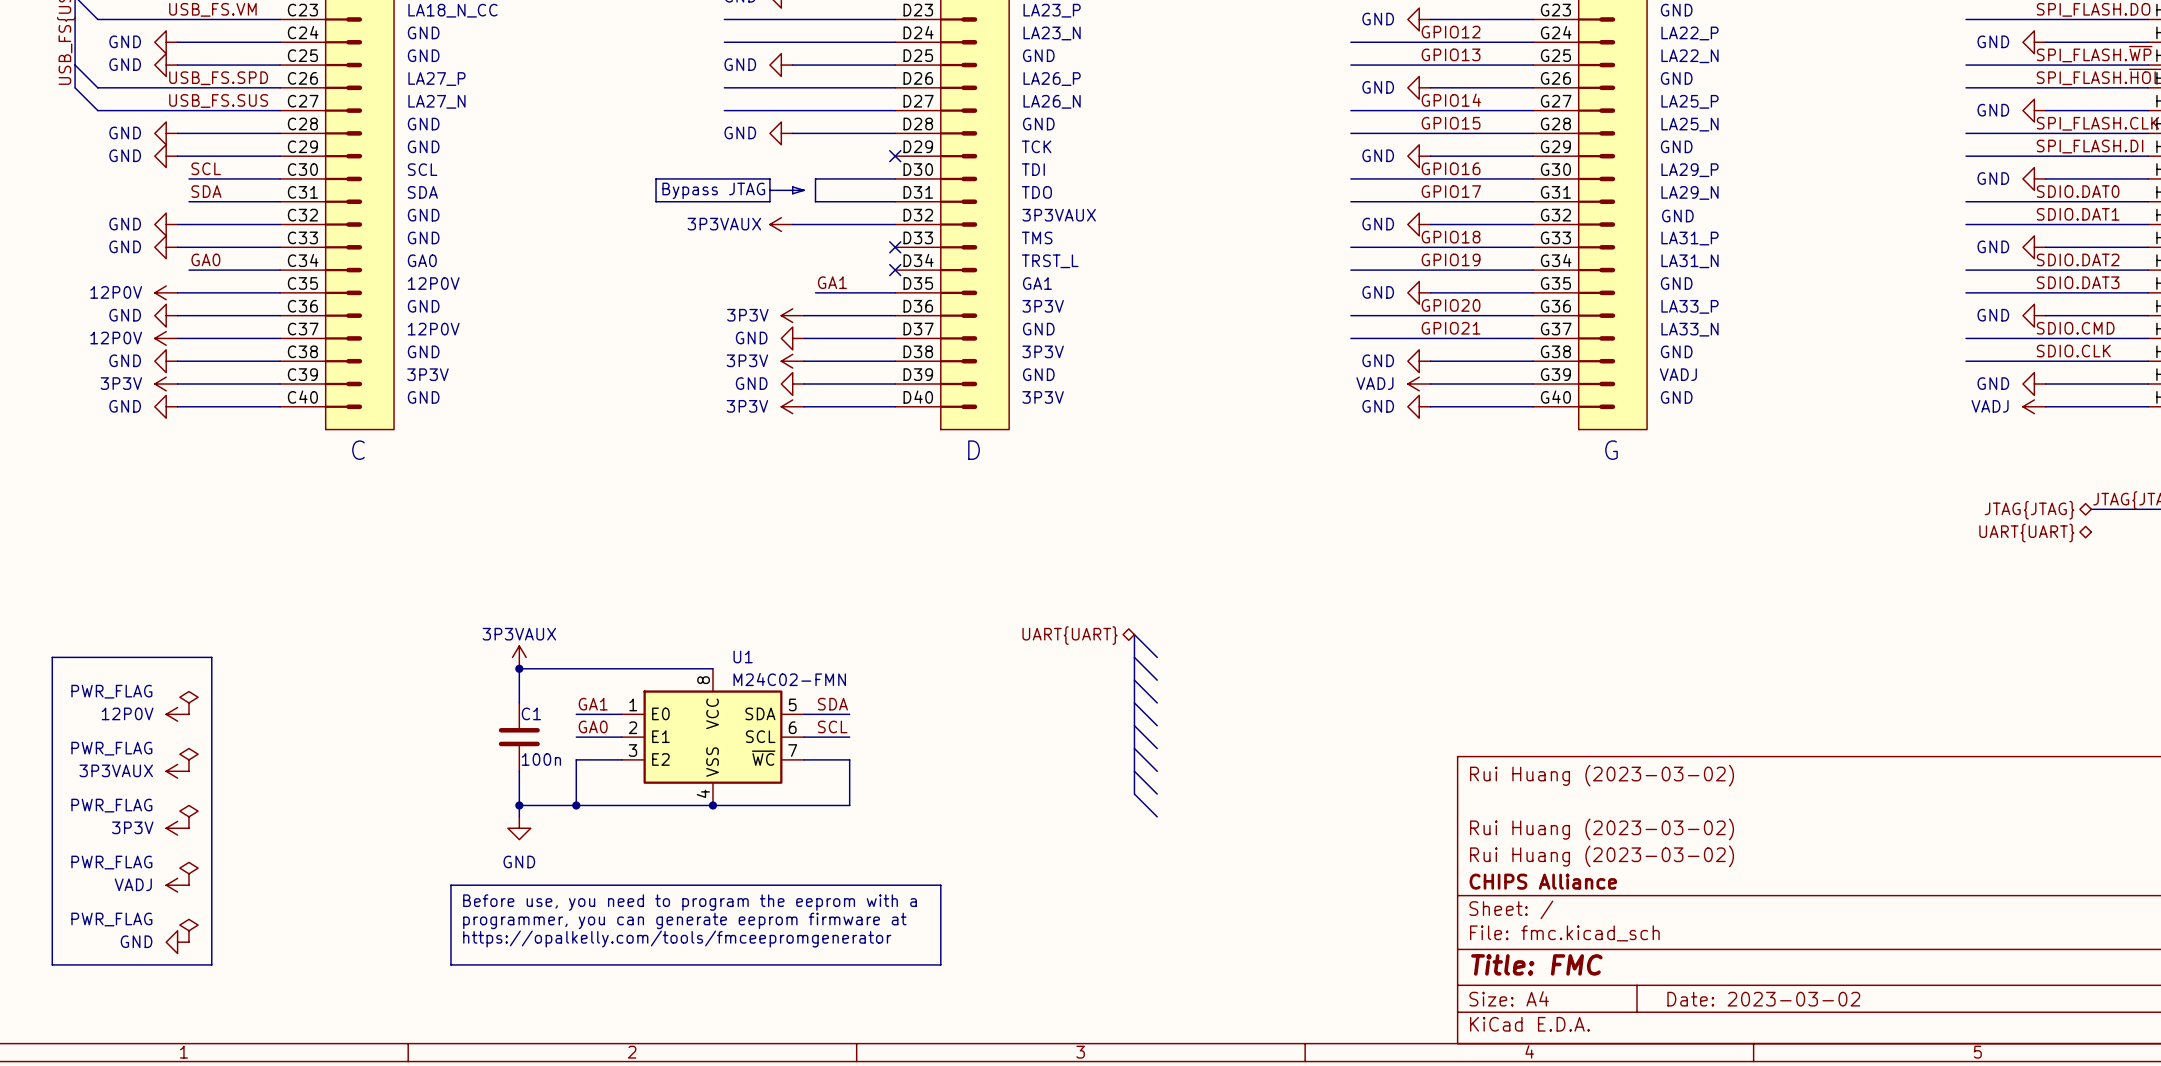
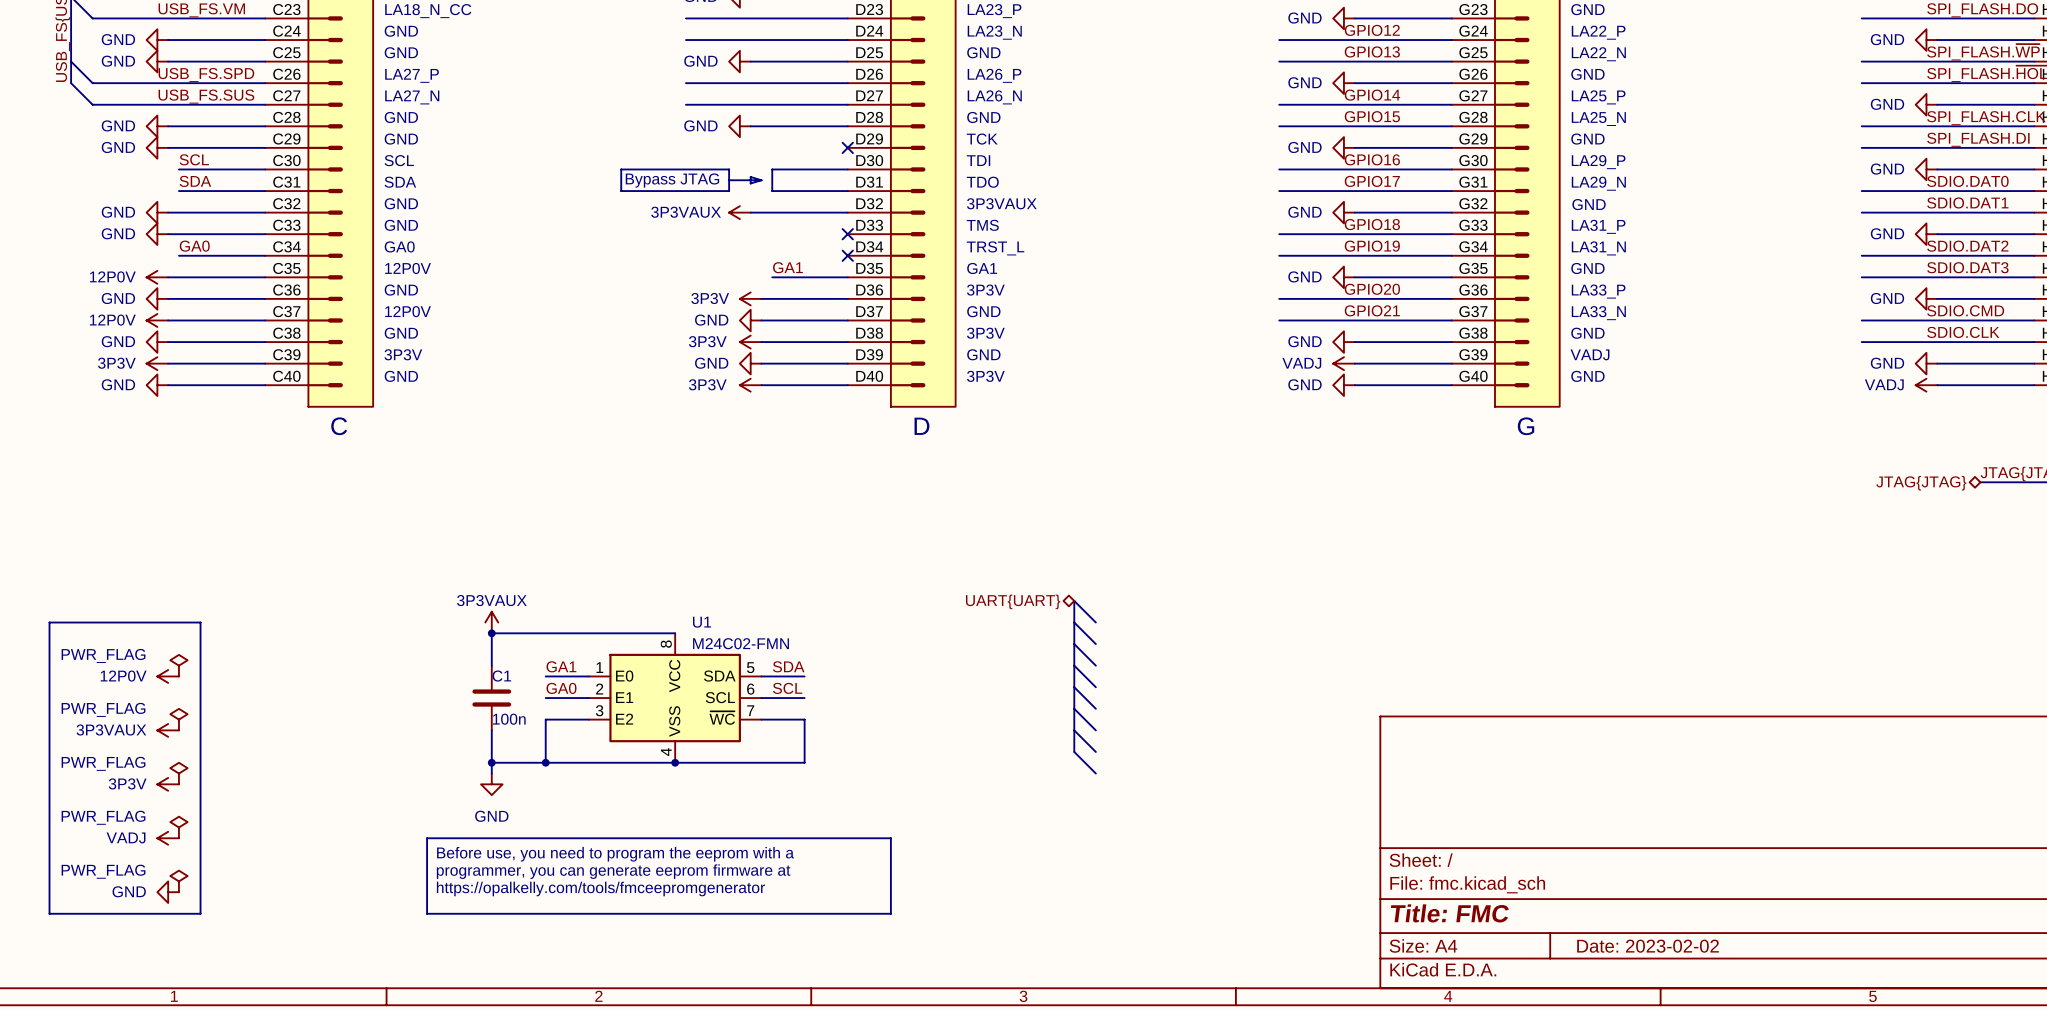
hierarchical label: UART{UART} (2026, 533) -> none
title block: Rui Huang (2023-03-02) (1602, 775) -> none
title block: Rui Huang (2023-03-02) (1602, 829) -> none
title block: Rui Huang (2023-03-02) (1602, 856) -> none
title block: CHIPS Alliance (1543, 881) -> none
title block: Date: 2023-03-02 (1763, 999) -> Date: 2023-02-02 (1648, 946)

